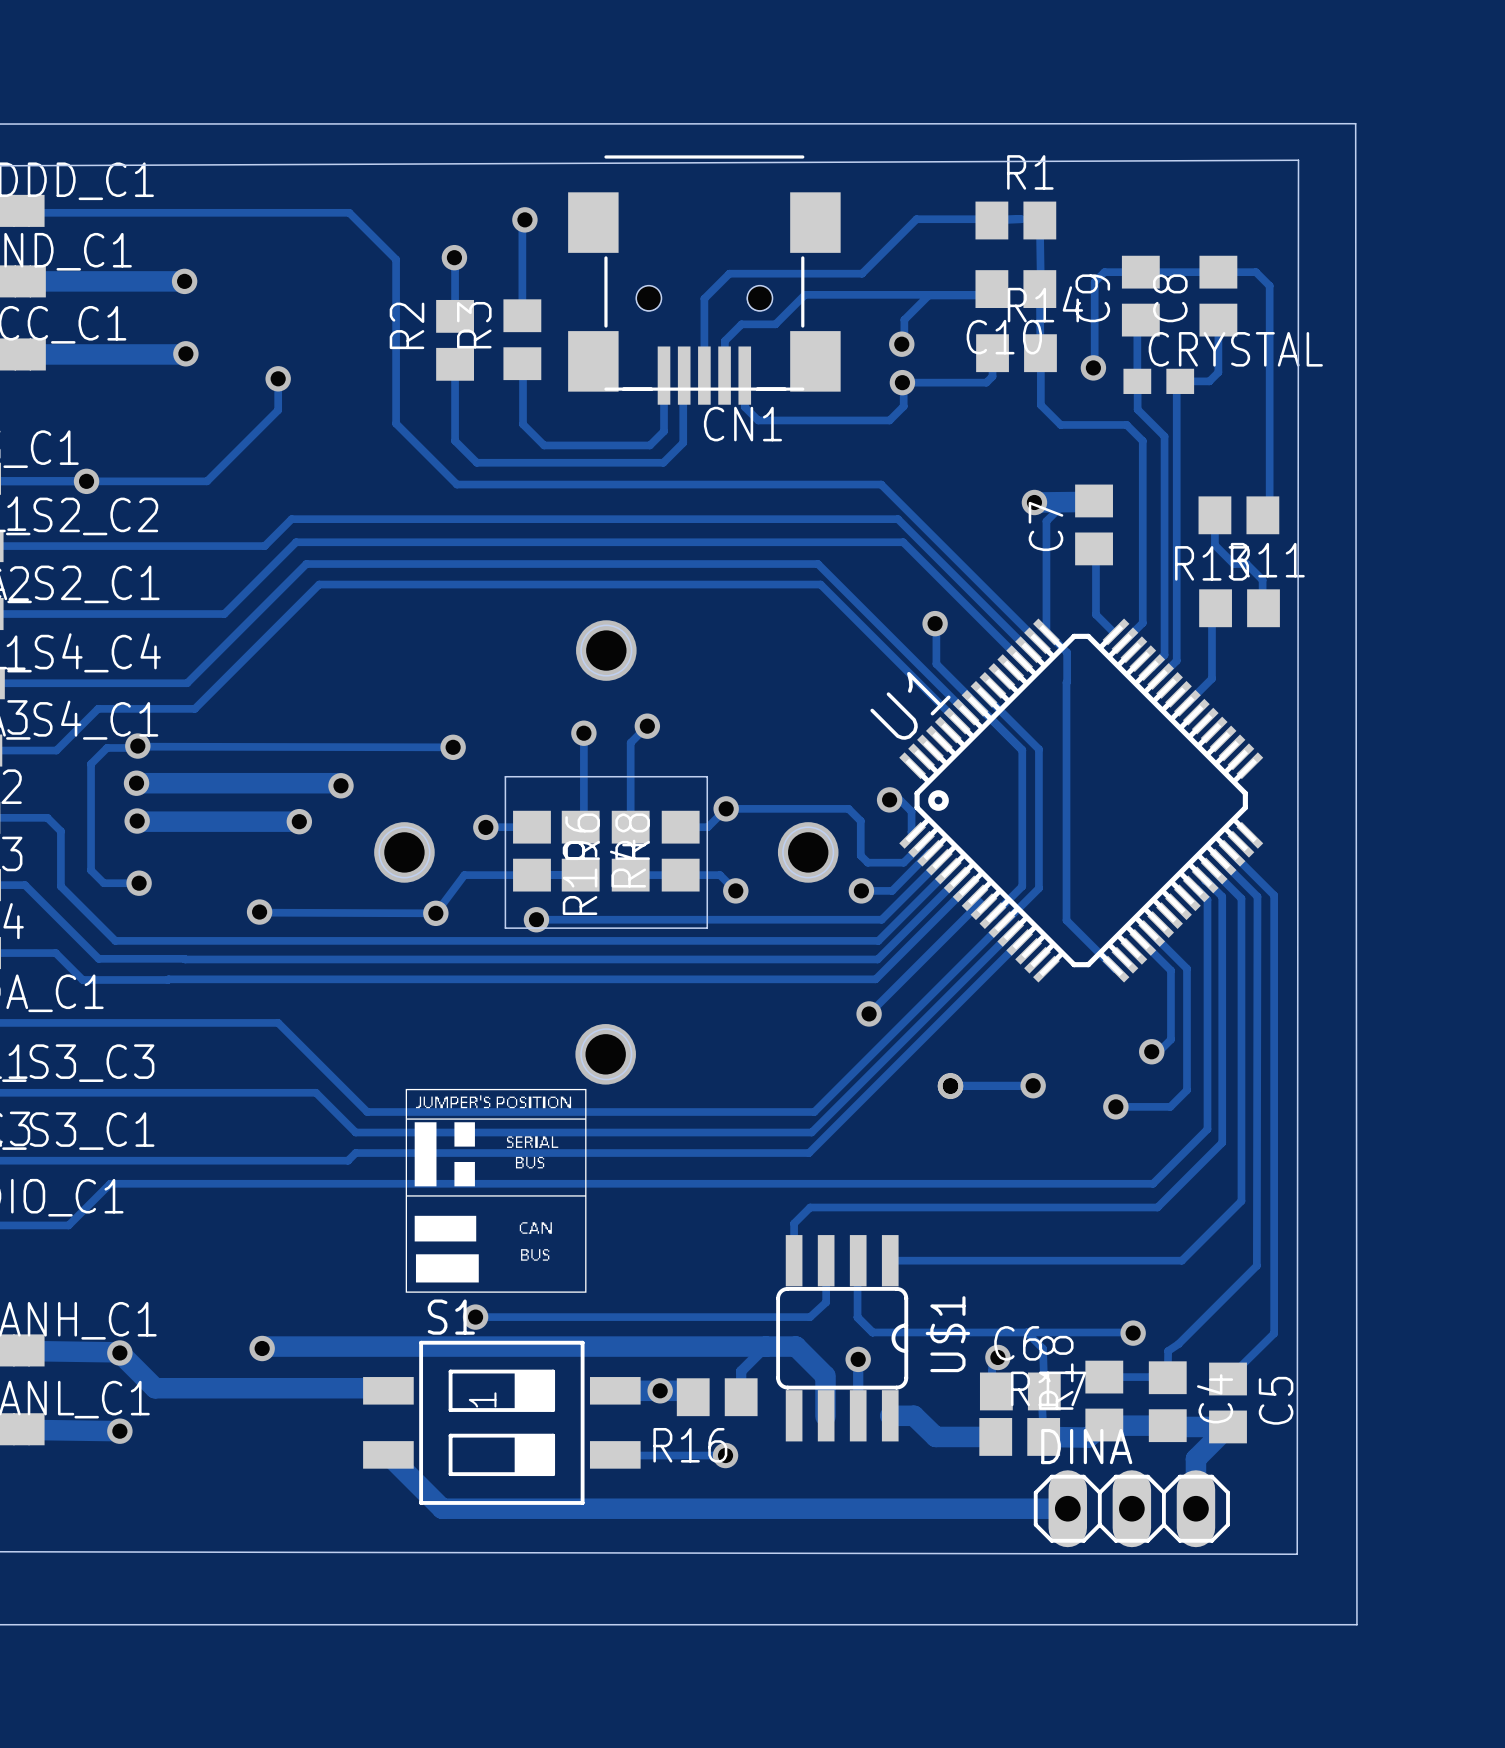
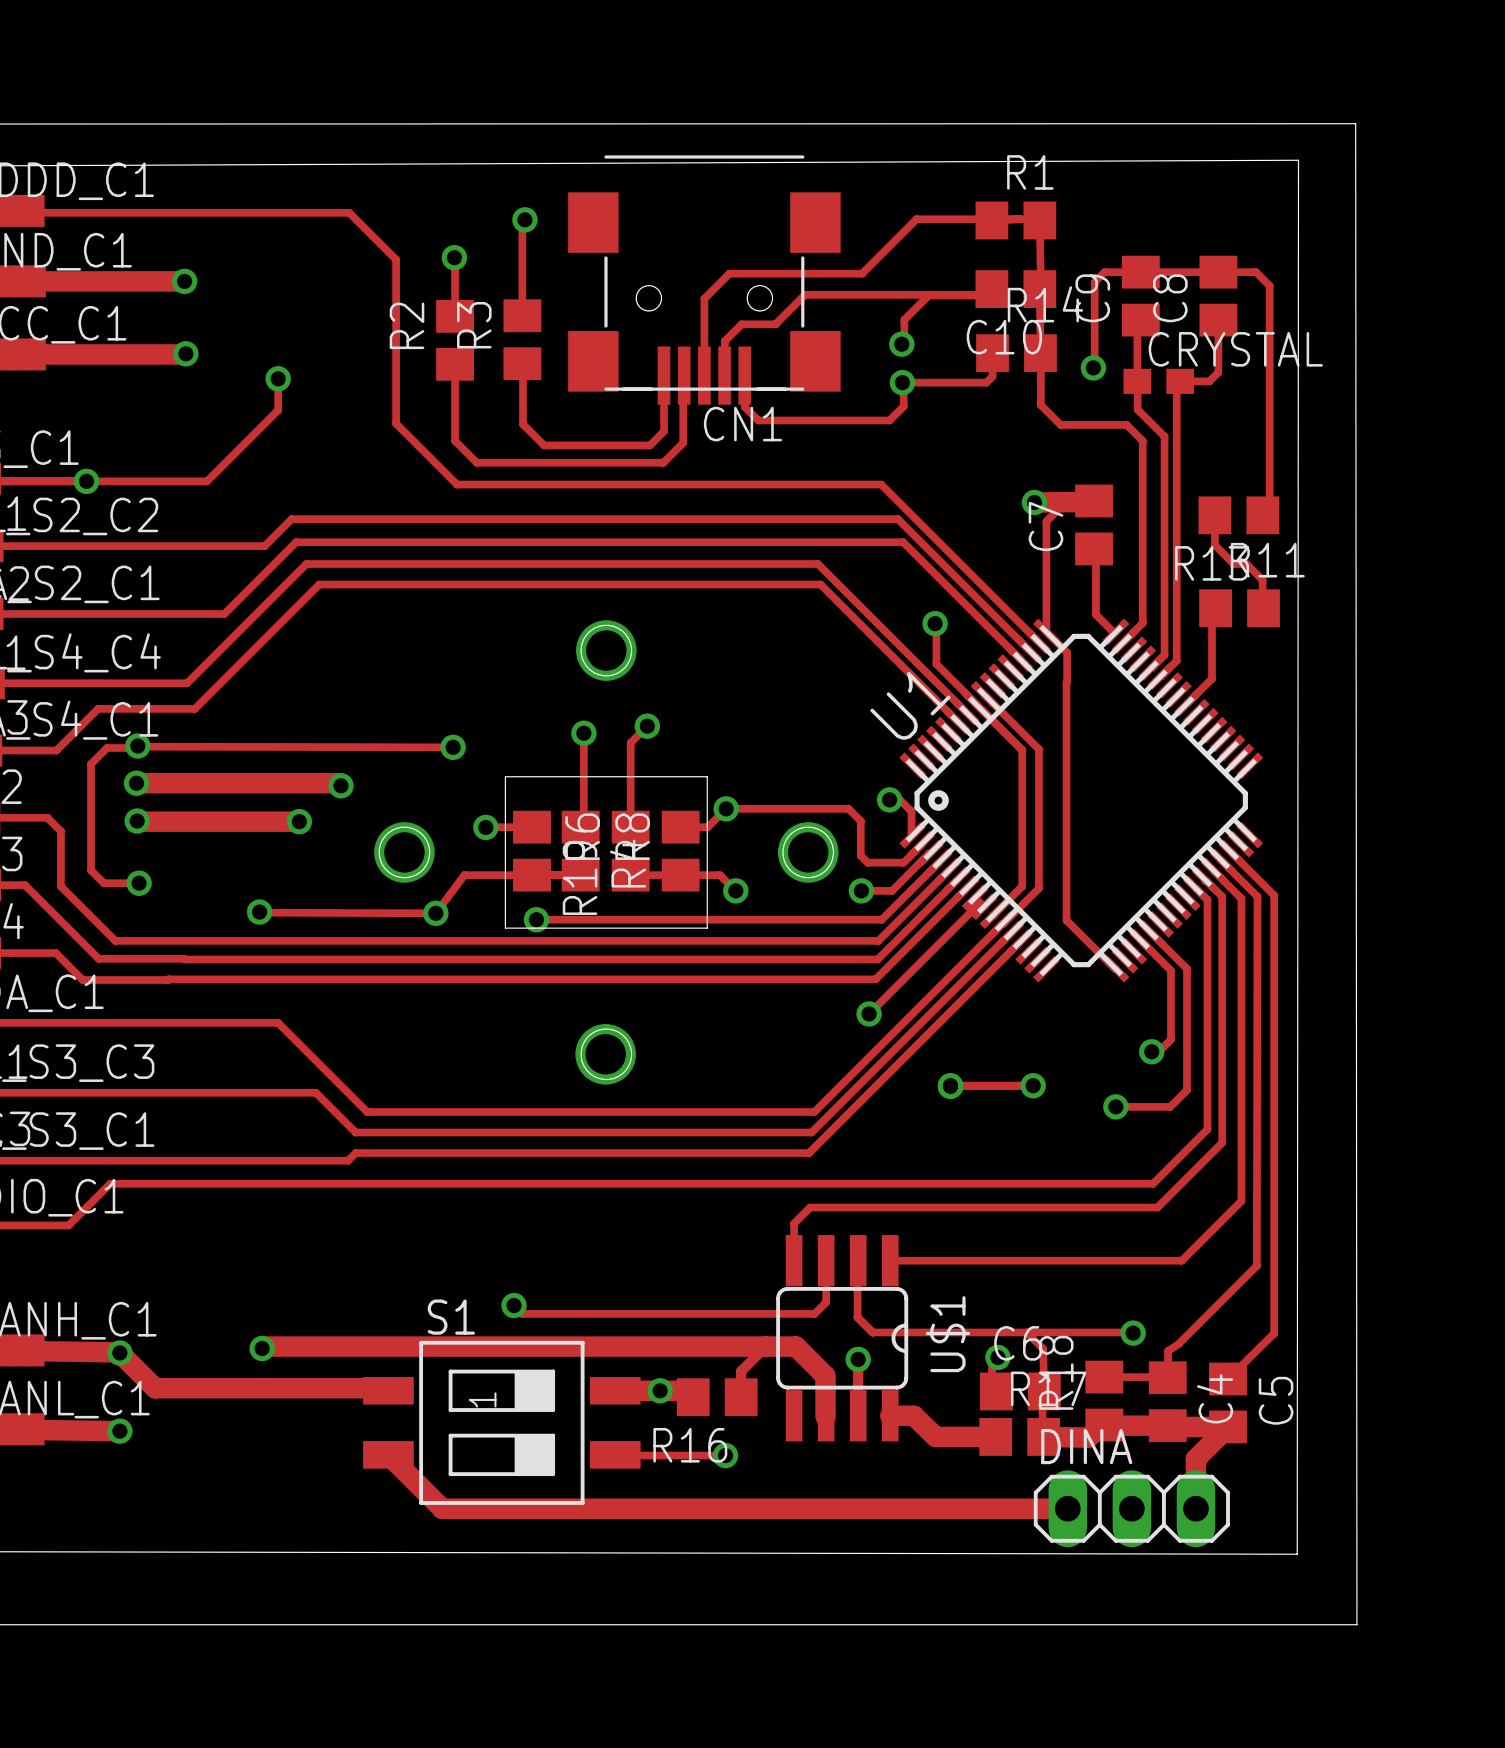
drawing: [405, 1088, 587, 1293] -> none
track: (826, 1302) (810, 1317) (475, 1317) -> (826, 1302) (814, 1313) (522, 1313) (514, 1305)
via position: (475, 1317) -> (514, 1305)

